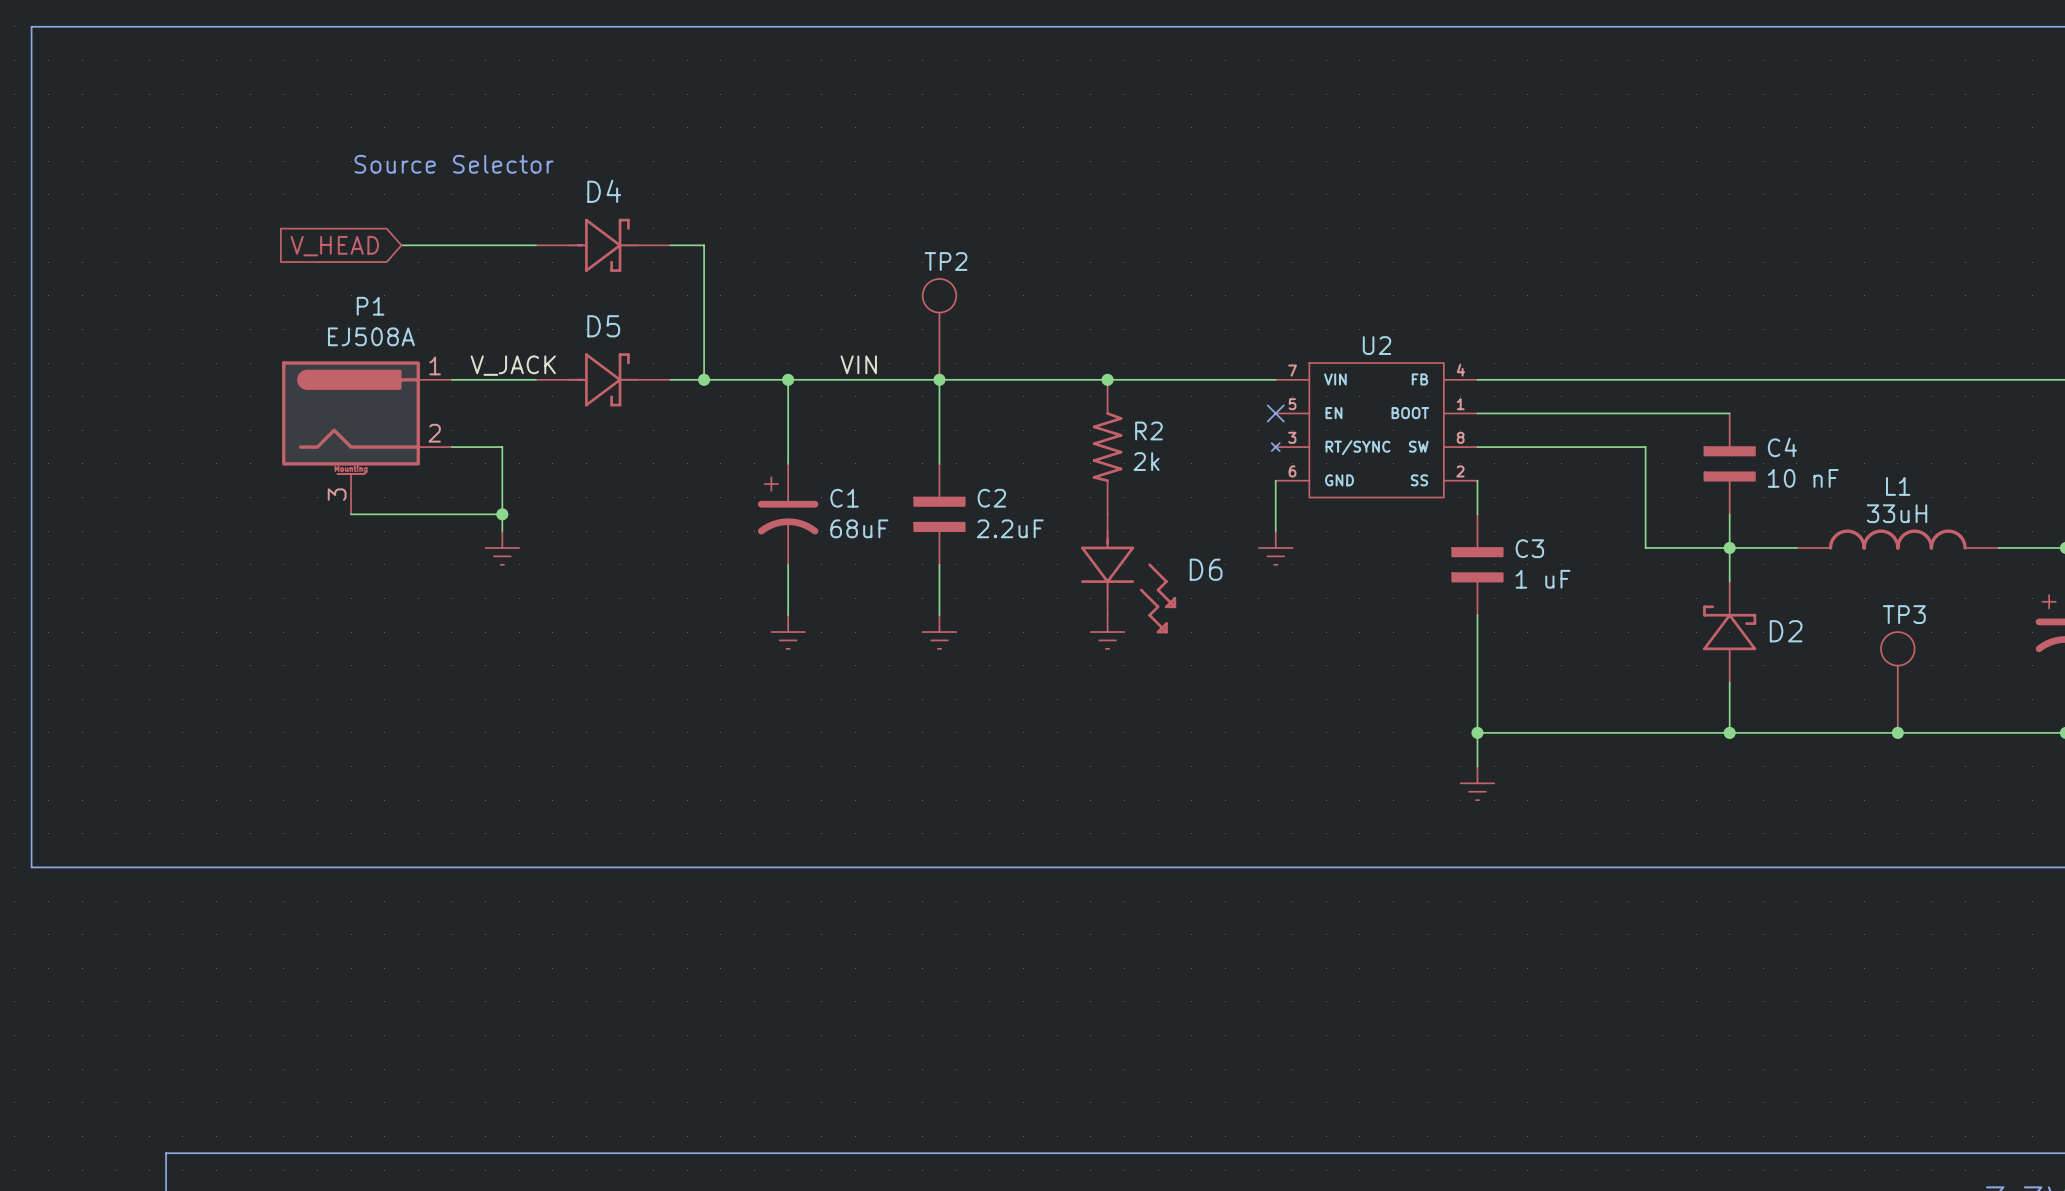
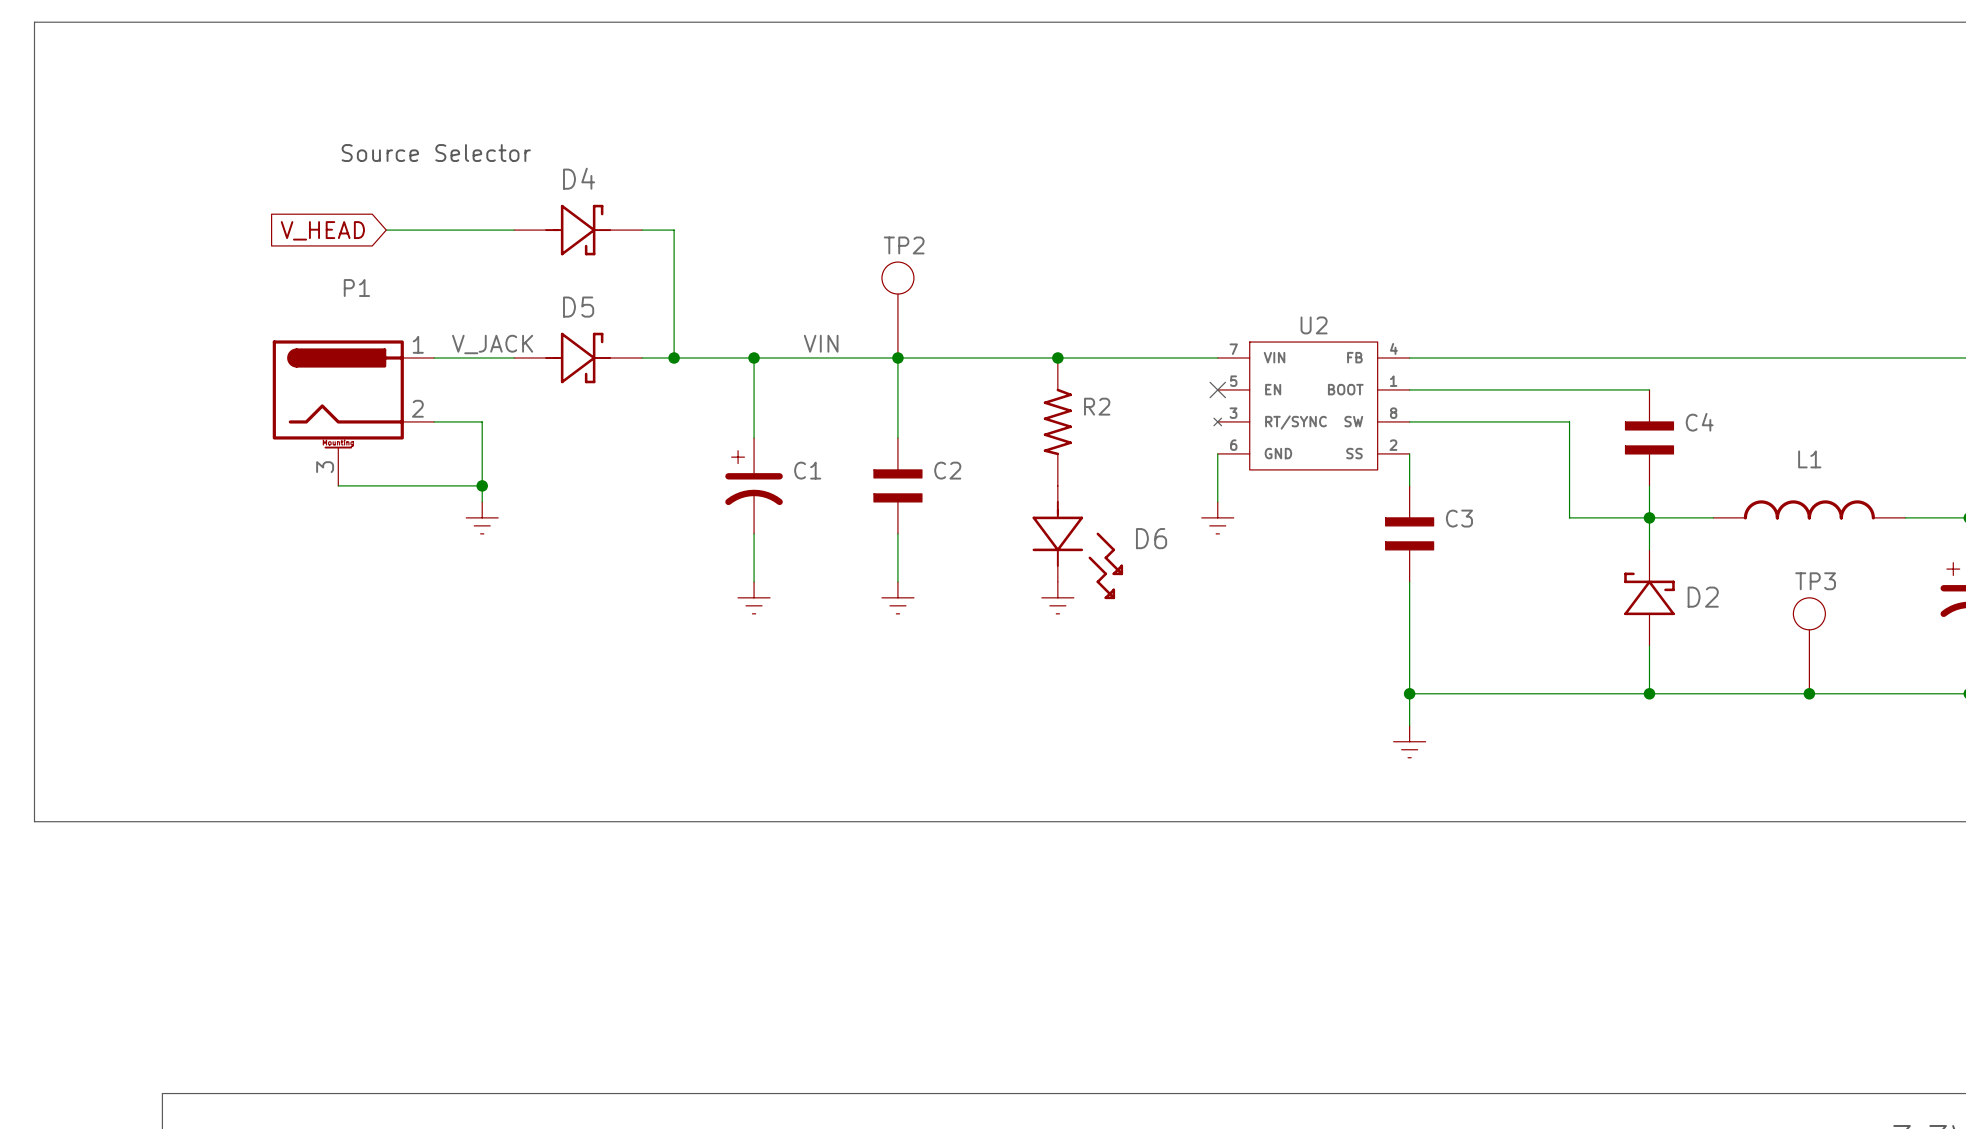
P1 value: EJ508A (371, 336) -> none
R2 value: 2k (1146, 461) -> none
C4 value: 10 nF (1803, 478) -> none
L1 value: 33uH (1897, 513) -> none
C1 value: 68uF (859, 528) -> none
C2 value: 2.2uF (1010, 528) -> none
C3 value: 1 uF (1543, 579) -> none

